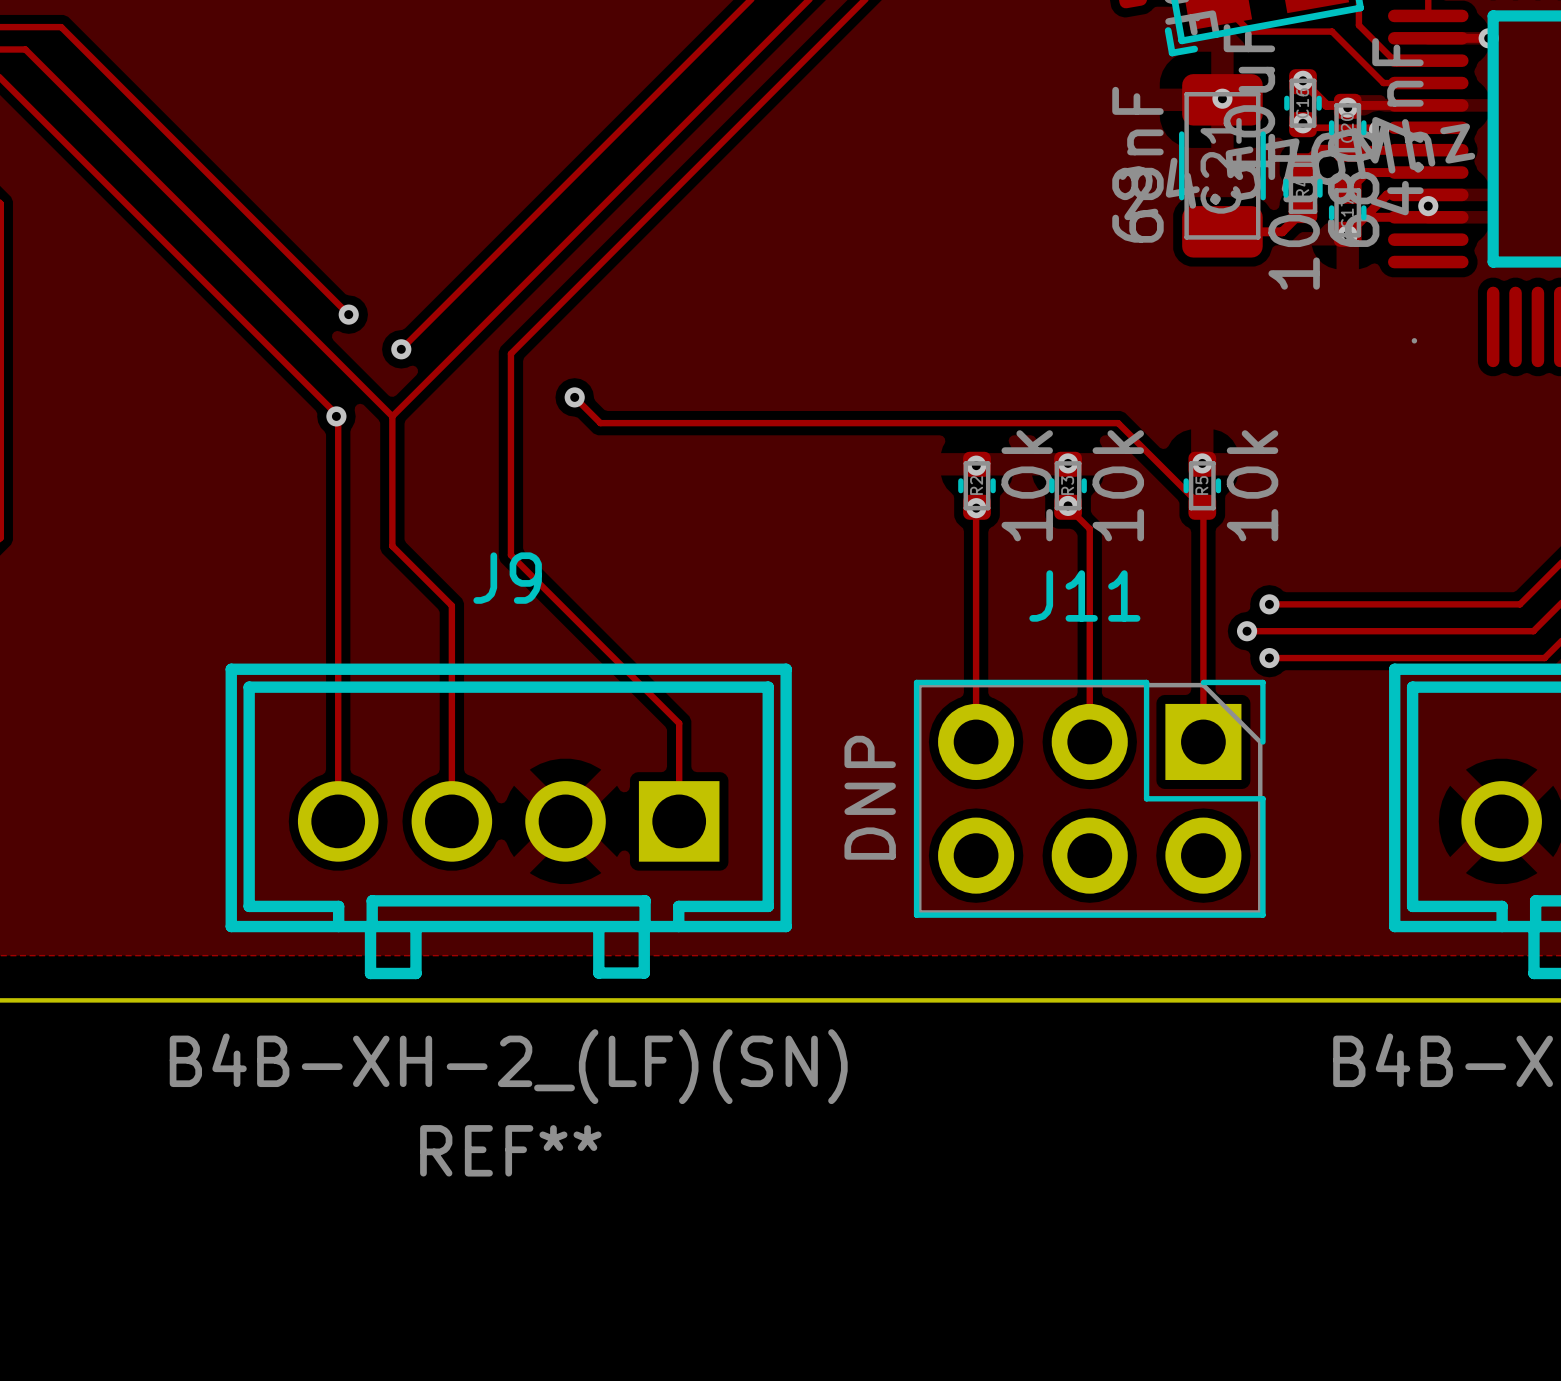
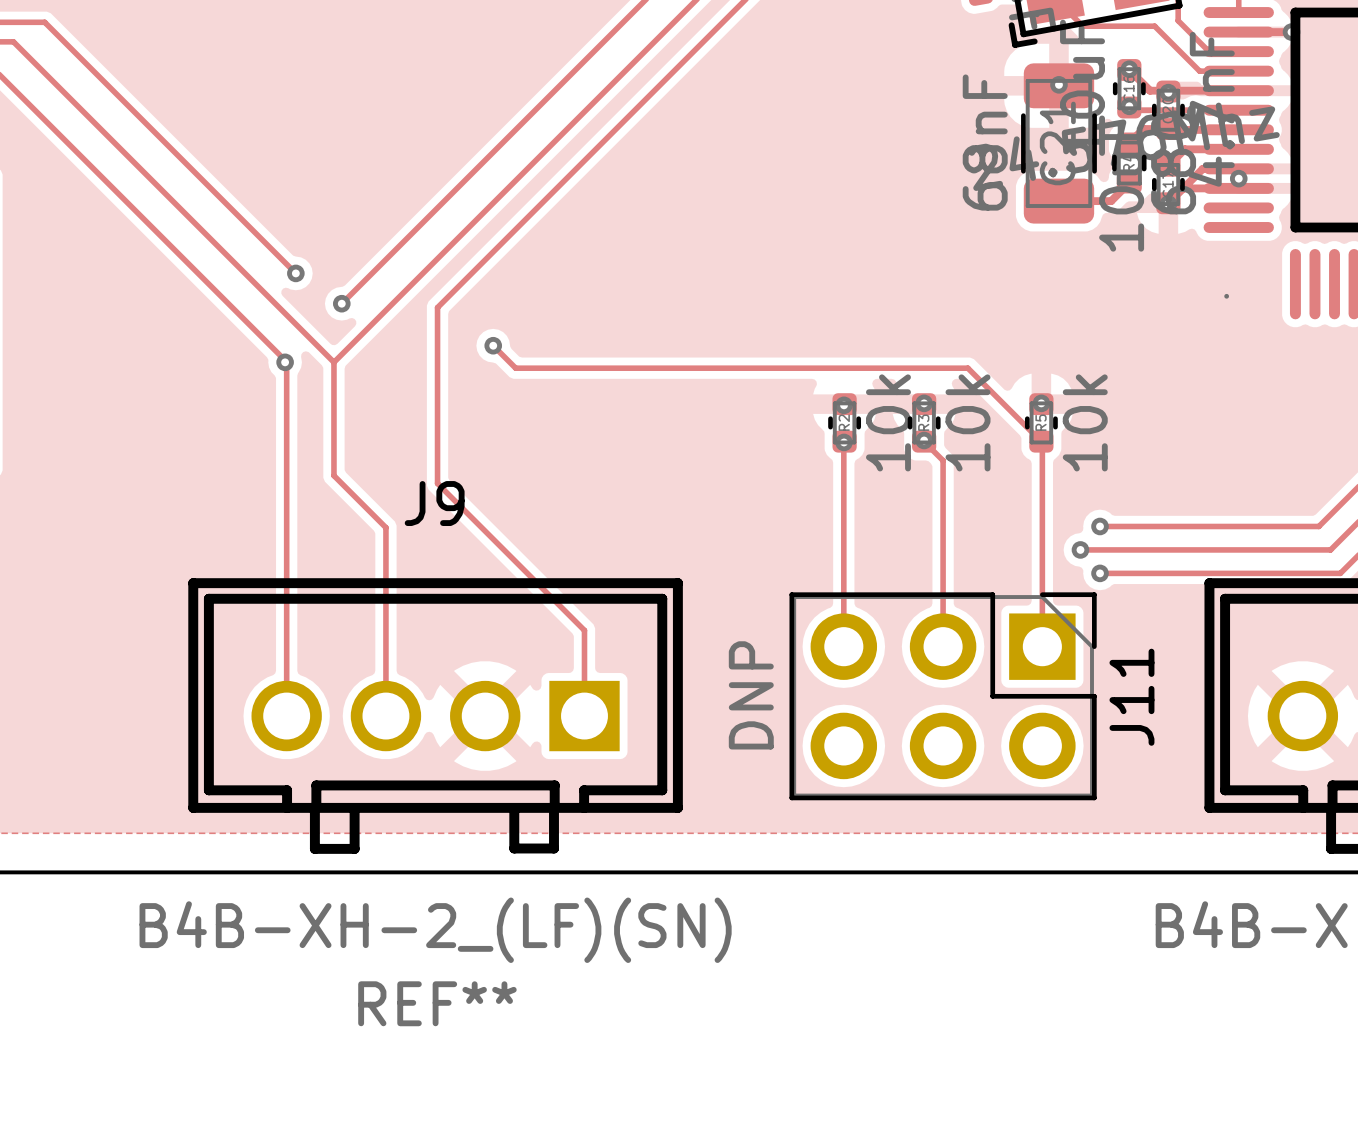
J11 name rotation: 0° (1084, 595) -> 90° counterclockwise (1131, 697)
J11 name position: J11 (1084, 595) -> J11 (1131, 697)

